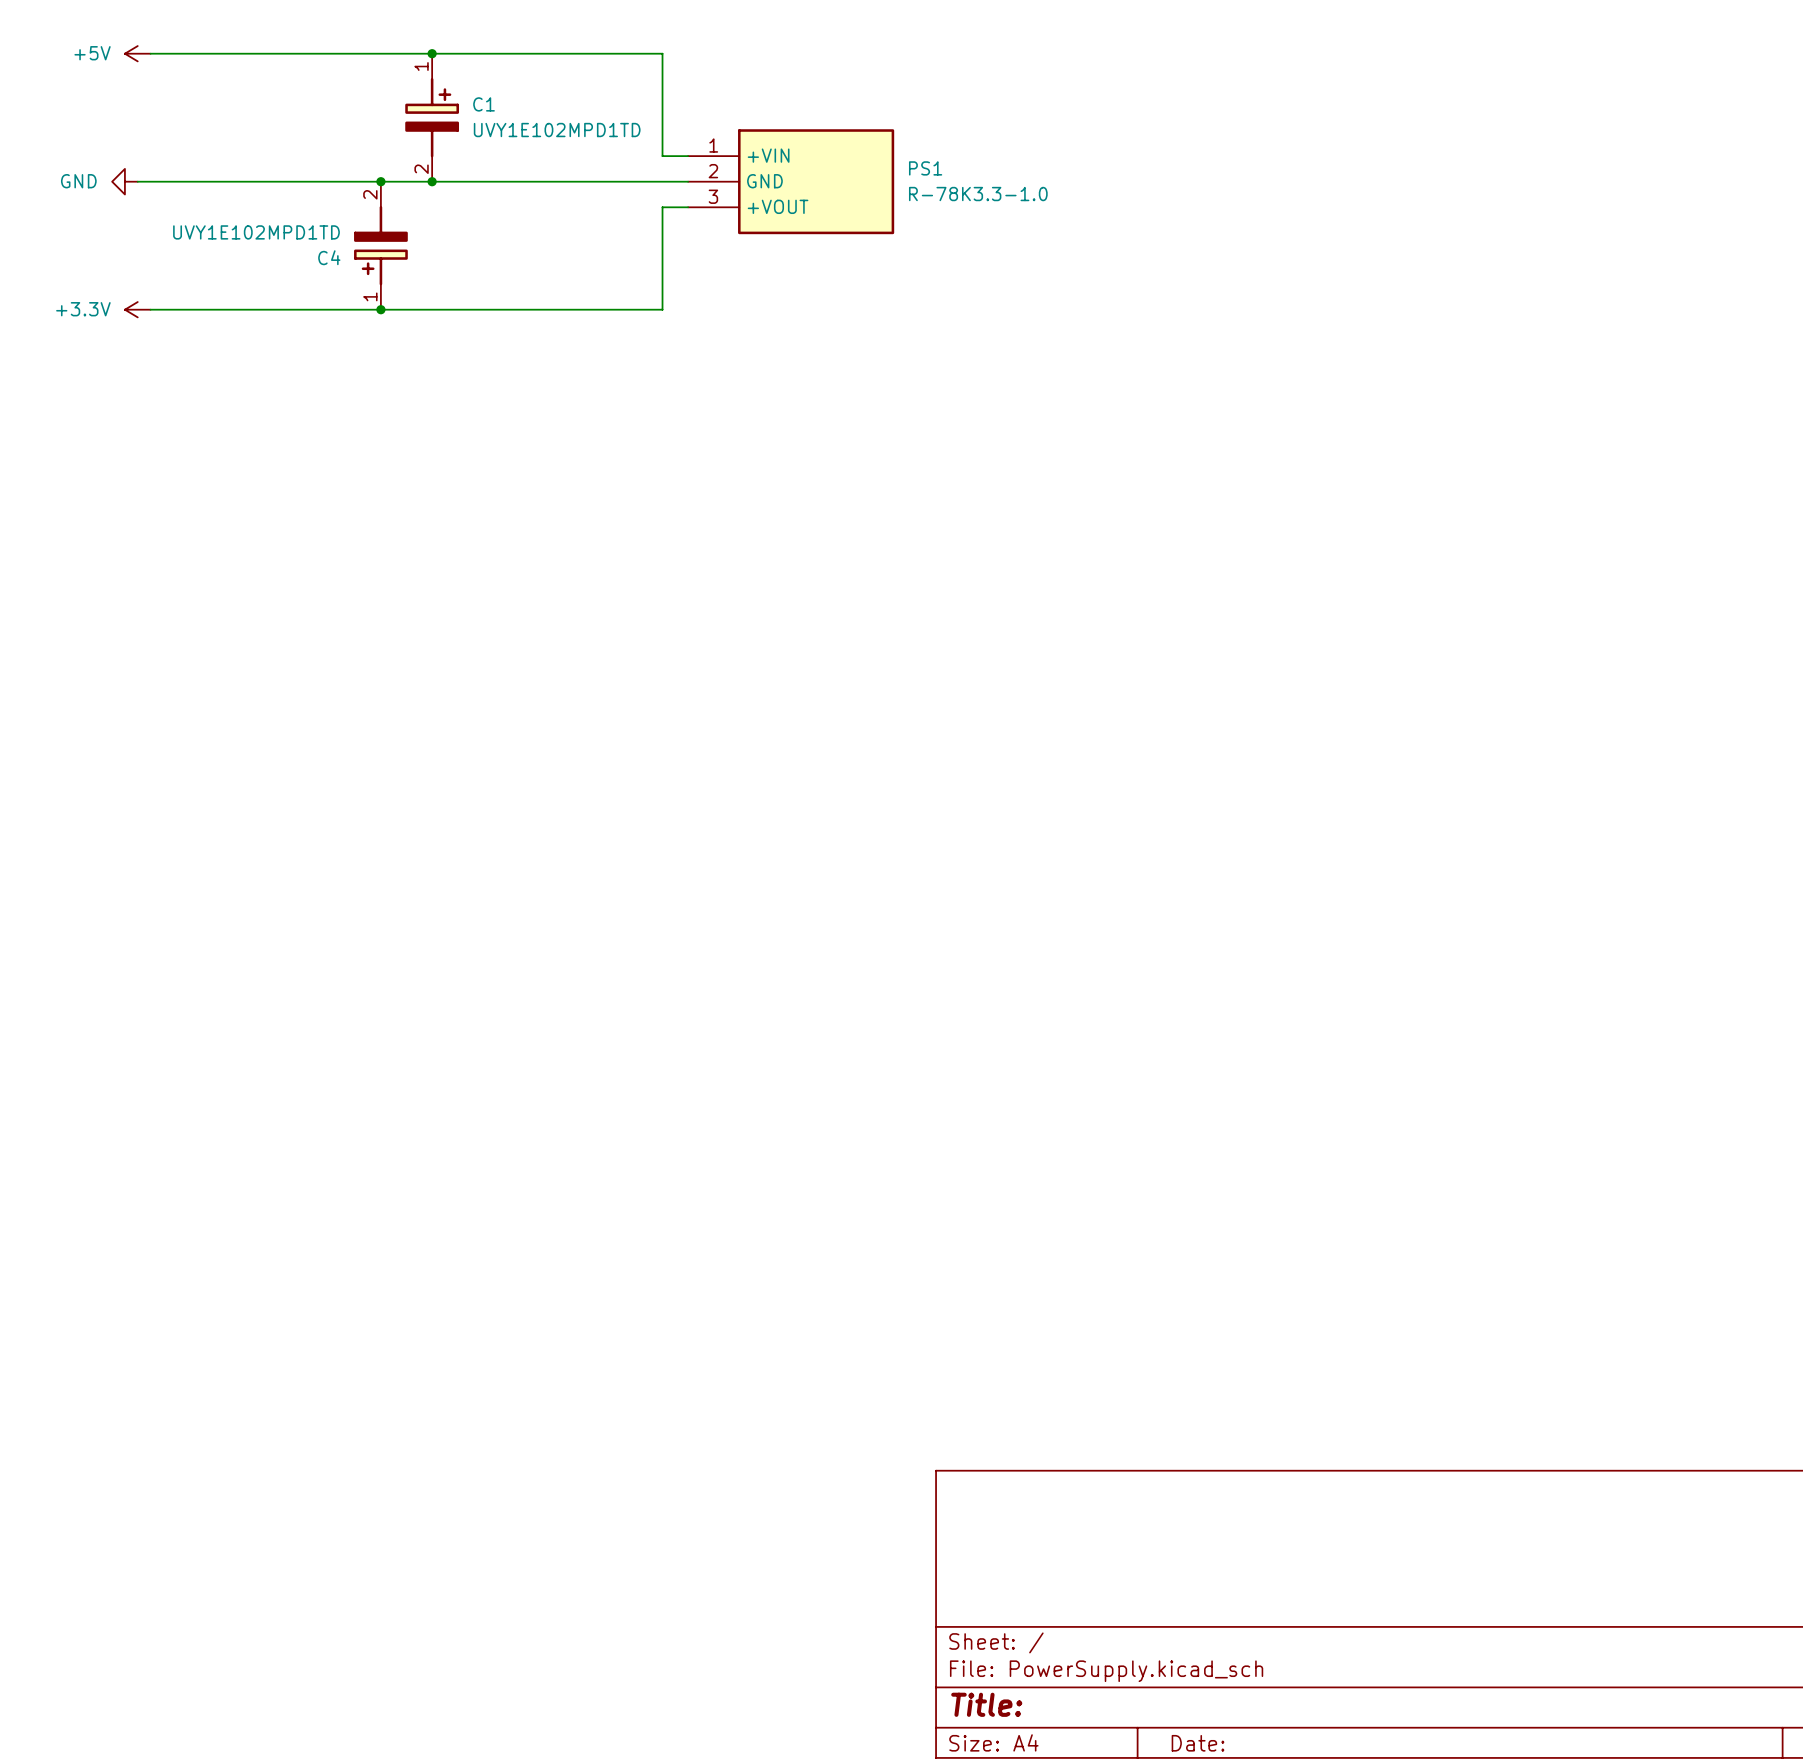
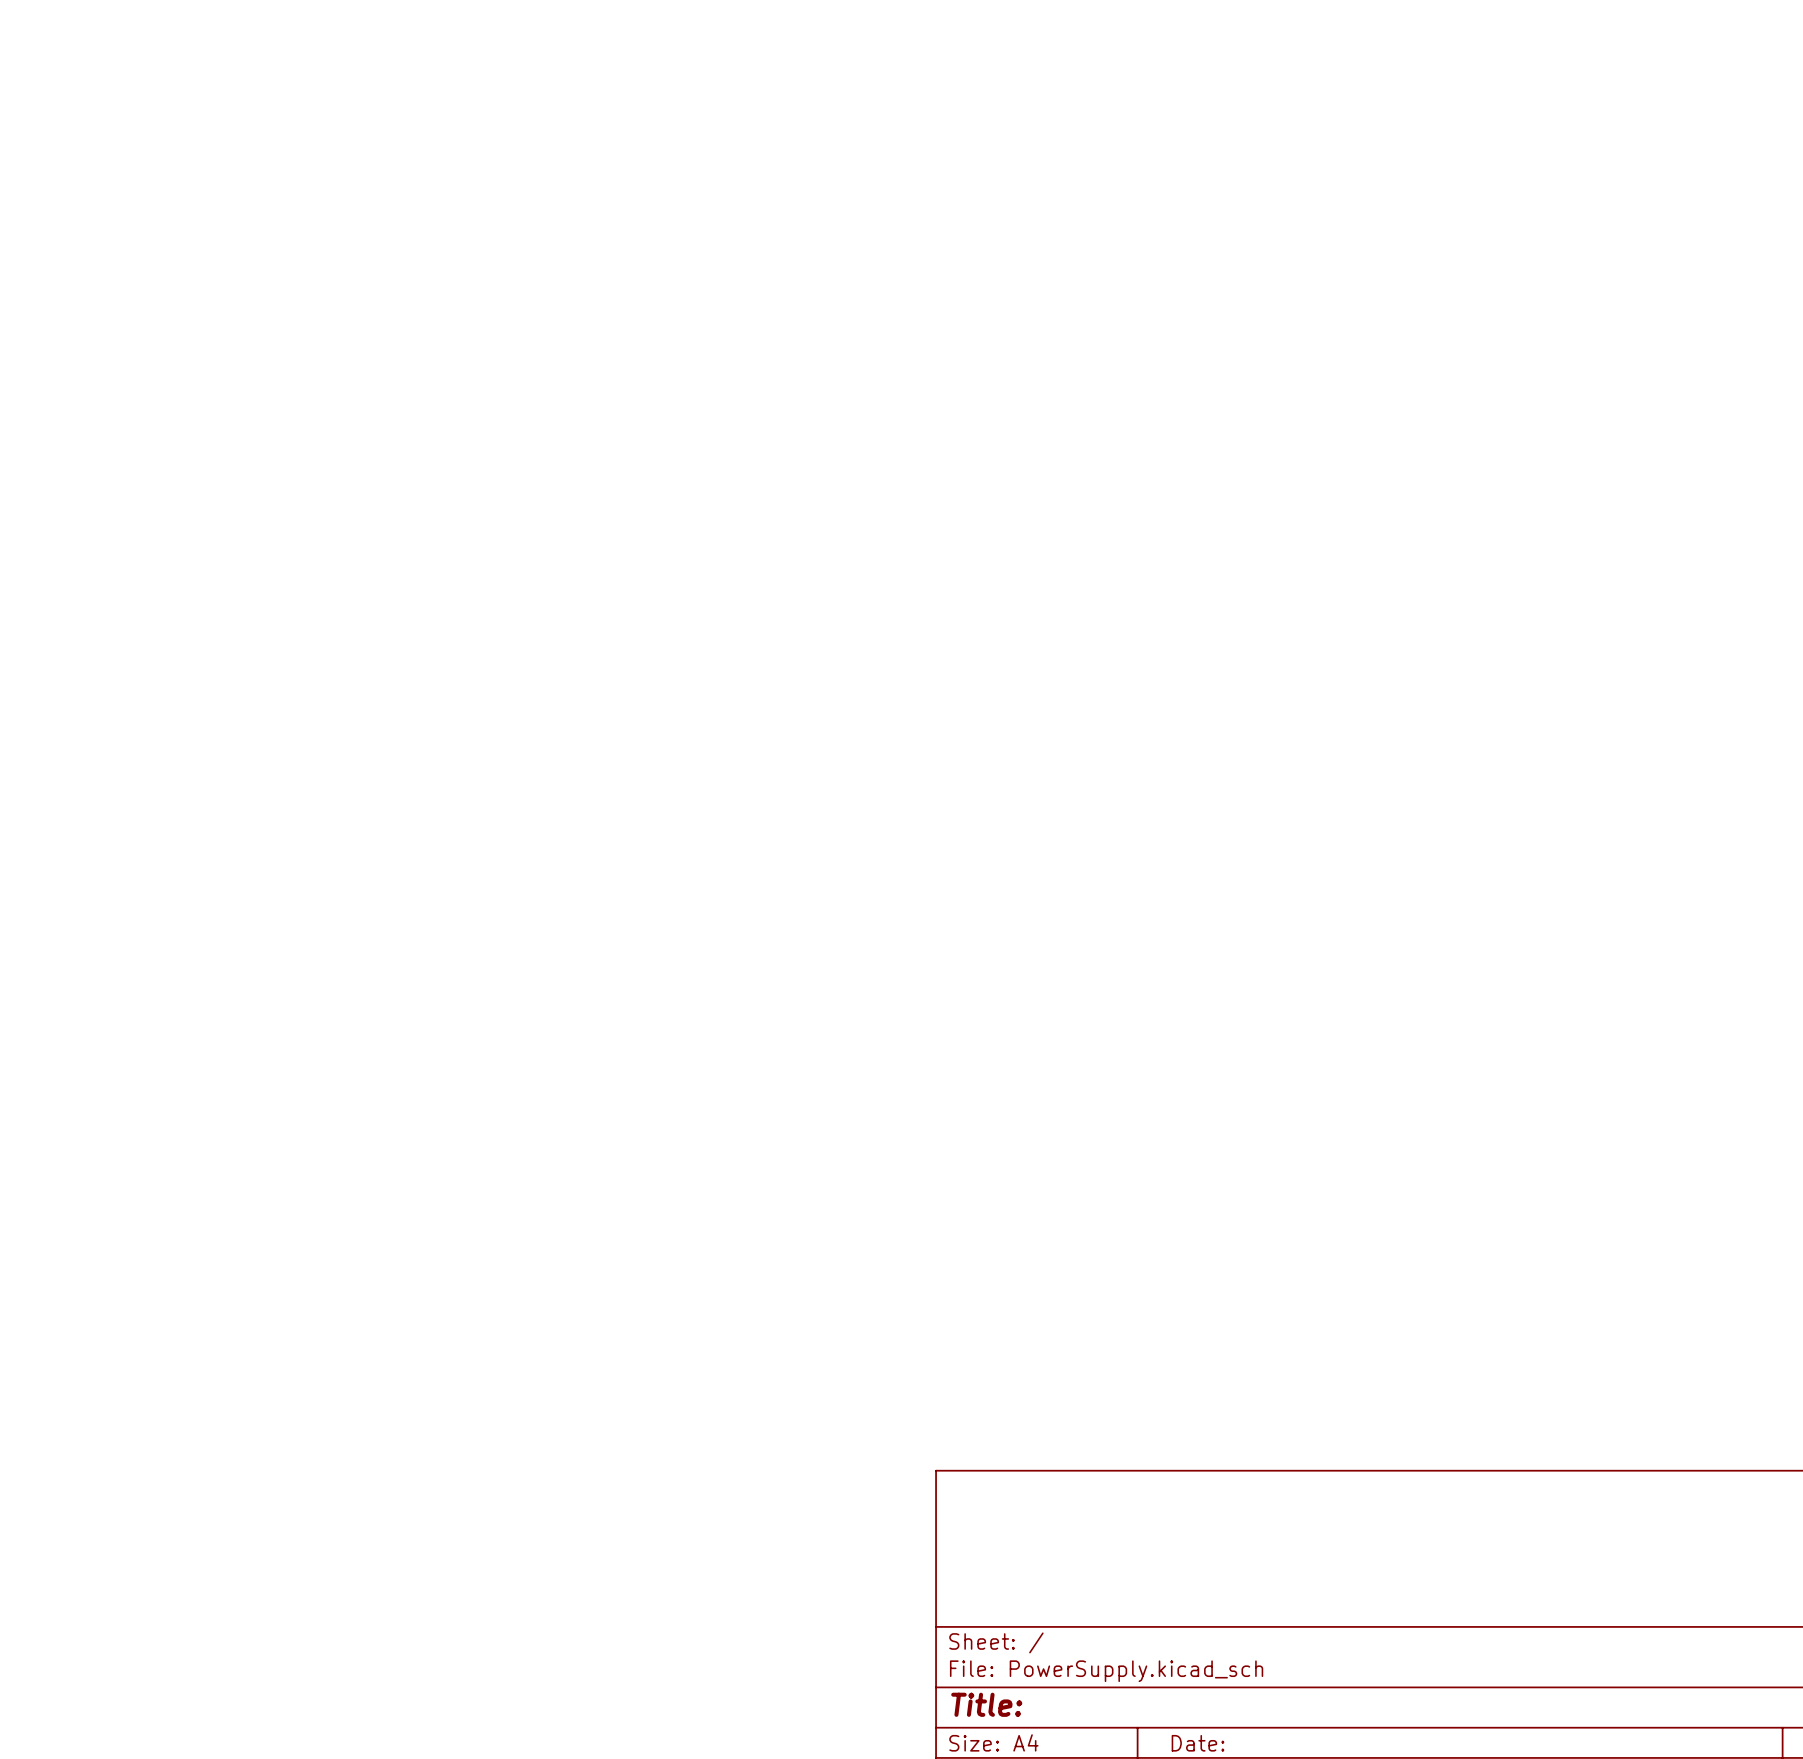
power symbol: +5V (137, 53) -> none
wire: (150, 53) (662, 53) (662, 156) (688, 156) -> none
junction: (432, 53) -> none
C1: UVY1E102MPD1TD (432, 117) -> none
power symbol: GND (124, 181) -> none
wire: (137, 181) (688, 181) -> none
junction: (380, 181) -> none
junction: (432, 181) -> none
PS1: R-78K3.3-1.0 (791, 181) -> none
wire: (688, 207) (662, 207) (662, 309) (150, 309) -> none
C4: UVY1E102MPD1TD (380, 245) -> none
power symbol: +3.3V (137, 309) -> none
junction: (380, 309) -> none

